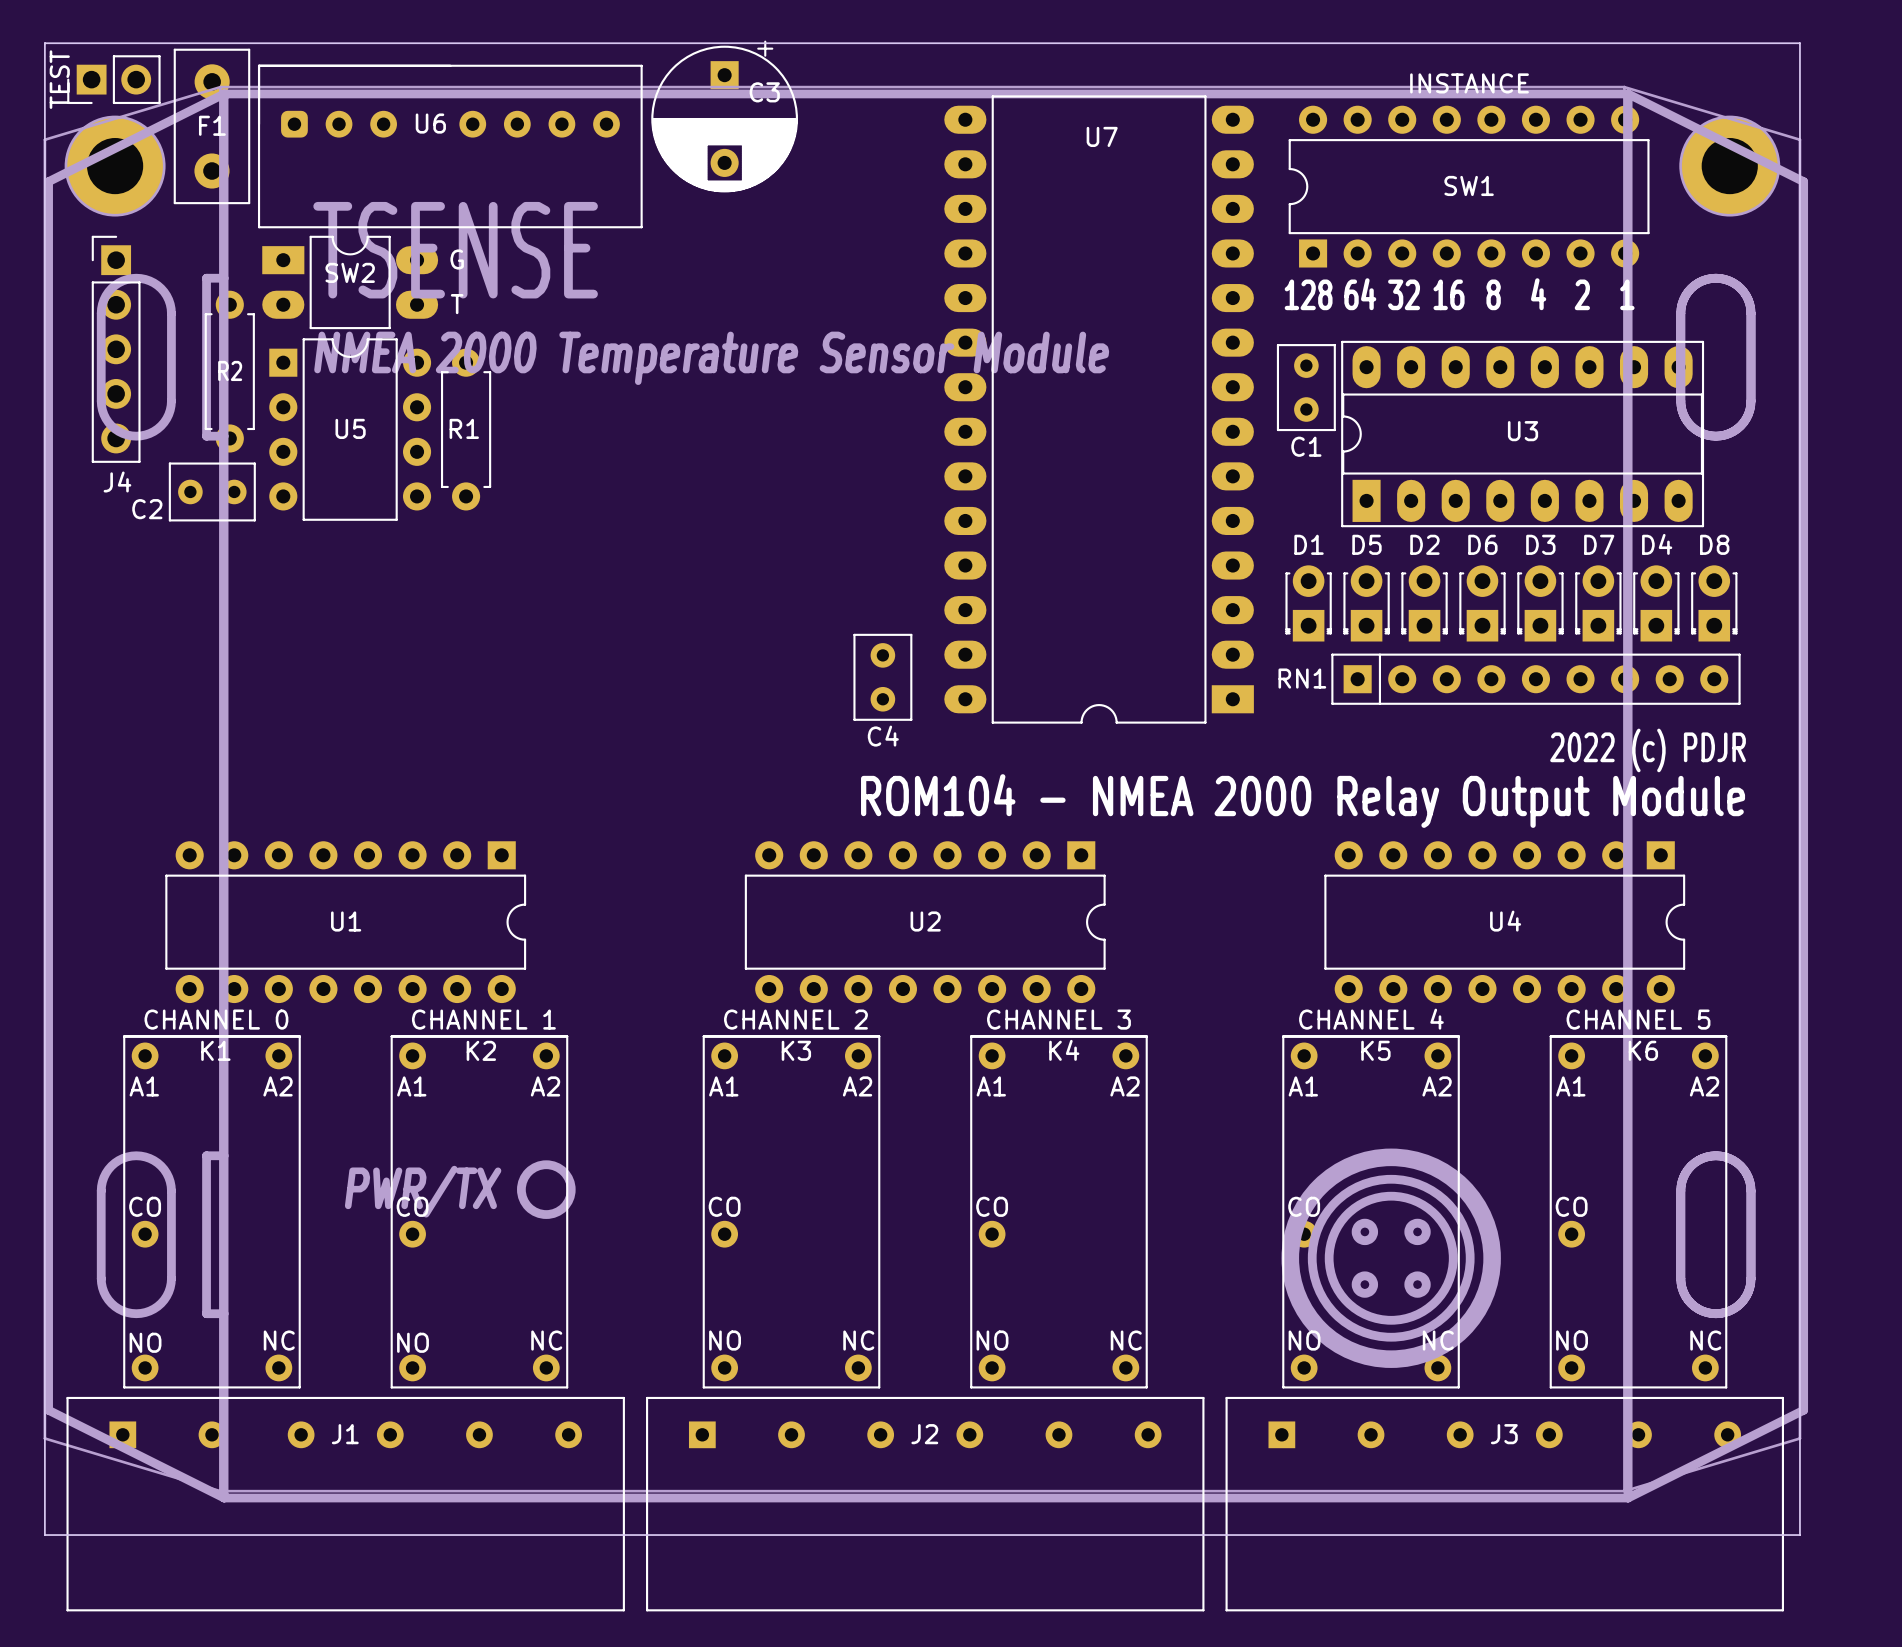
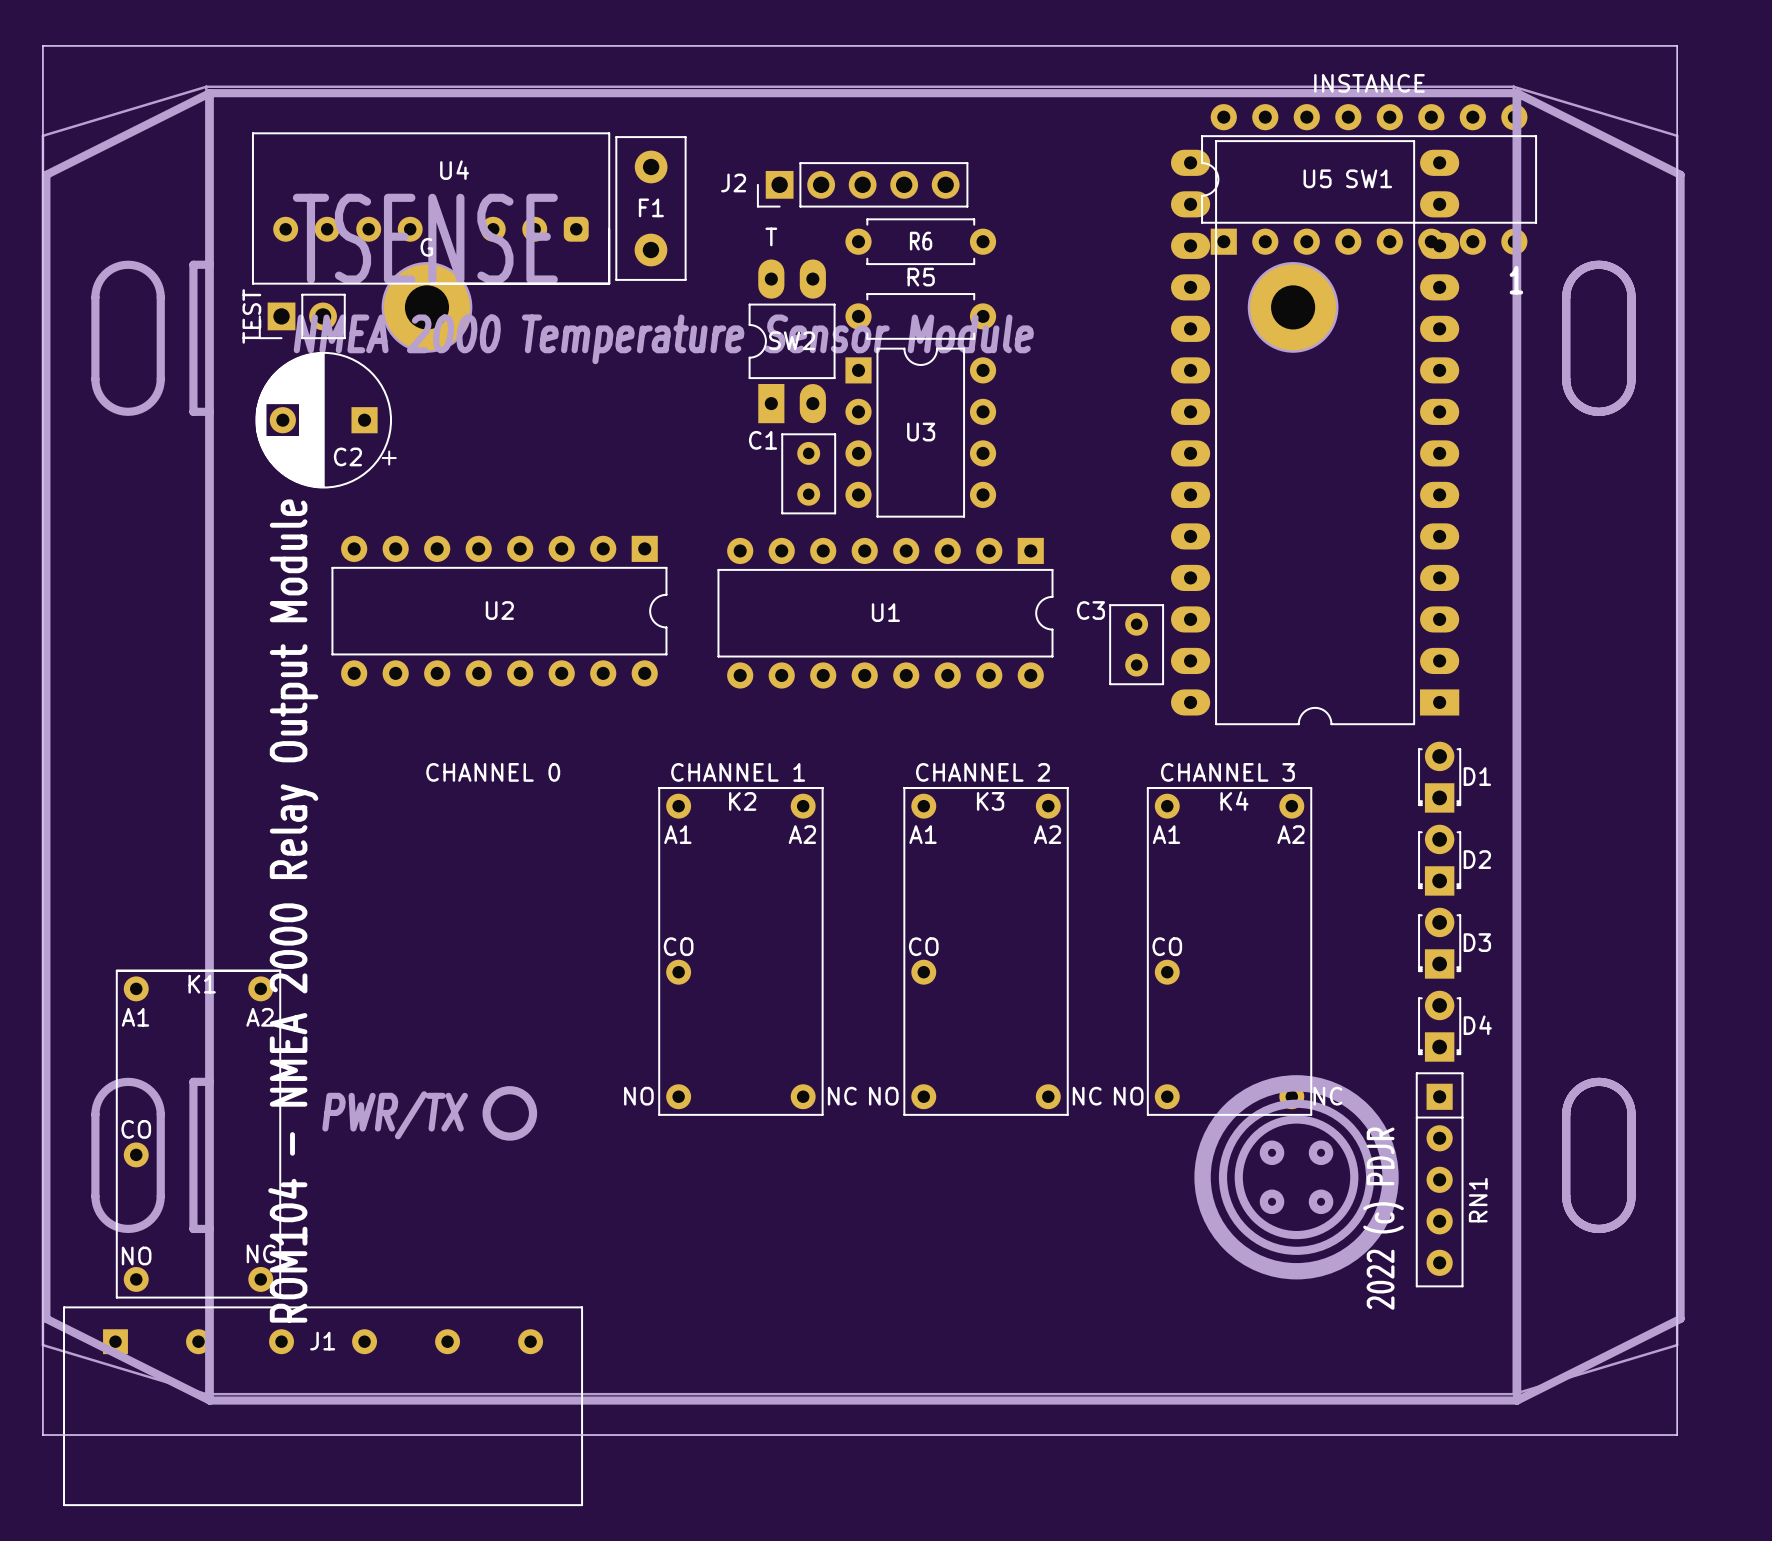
C3 footprint: [651, 40, 798, 193] -> [1109, 604, 1165, 686]
TEST position: (113, 79) -> (302, 316)
C3 name position: C3 (764, 92) -> C3 (1090, 610)
F1 position: (211, 126) -> (650, 208)
U6: (450, 146) -> none
part: (115, 166) -> none
part: (1729, 166) -> none
R6: none -> (920, 241)
SW2 rotation: 0° (350, 282) -> 90° counterclockwise (792, 341)
SW2 position: (350, 282) -> (792, 341)
text: 128 (1308, 294) -> none
text: 64 (1360, 294) -> none
text: 32 (1404, 294) -> none
text: 16 (1449, 294) -> none
text: 8 (1493, 294) -> none
text: 4 (1538, 294) -> none
text: 2 (1582, 294) -> none
text position: T (457, 304) -> T (771, 236)
part: none -> (426, 307)
part: none -> (1293, 307)
R5: none -> (920, 316)
U5 footprint: [269, 338, 432, 521] -> [1170, 140, 1460, 726]
U3 footprint: [1341, 340, 1705, 528] -> [845, 347, 997, 518]
J4: (116, 349) -> none
R2: (229, 371) -> none
C1 position: (1306, 387) -> (808, 473)
U7: (1099, 409) -> none
U5 name position: U5 (350, 428) -> U5 (1317, 178)
R1: (466, 429) -> none
C1 name position: C1 (1306, 446) -> C1 (763, 440)
C2 footprint: [168, 462, 256, 522] -> [255, 351, 397, 489]
C2 name position: C2 (147, 509) -> C2 (347, 456)
D1 name position: D1 (1309, 544) -> D1 (1477, 776)
D2 name position: D2 (1424, 544) -> D2 (1477, 859)
D3 name position: D3 (1540, 544) -> D3 (1477, 942)
D4 name position: D4 (1657, 544) -> D4 (1477, 1025)
D1 position: (1308, 603) -> (1439, 777)
D5: (1366, 603) -> none
D2 position: (1424, 603) -> (1439, 860)
D6: (1482, 603) -> none
D3 position: (1540, 603) -> (1439, 943)
D7: (1598, 603) -> none
D4 position: (1656, 603) -> (1439, 1026)
D8: (1714, 603) -> none
RN1 footprint: [1331, 653, 1741, 705] -> [1415, 1072, 1464, 1288]
C4: (882, 677) -> none
RN1 name position: RN1 (1302, 678) -> RN1 (1478, 1200)
text: 2022 (c) PDJR (1648, 750) -> none
text: ROM104 - NMEA 2000 Relay Output Module (1303, 801) -> none
U4 footprint: [1324, 841, 1686, 1004] -> [251, 132, 611, 285]
U4 name position: U4 (1505, 921) -> U4 (454, 170)
U1 position: (345, 922) -> (885, 613)
U2 position: (925, 922) -> (499, 611)
text: none -> ROM104 - NMEA 2000 Relay Output Module (293, 911)
text position: CHANNEL 0 (216, 1019) -> CHANNEL 0 (493, 772)
text position: CHANNEL 1 (483, 1019) -> CHANNEL 1 (738, 772)
text position: CHANNEL 2 (795, 1019) -> CHANNEL 2 (983, 772)
text position: CHANNEL 3 (1058, 1019) -> CHANNEL 3 (1227, 772)
text: CHANNEL 4 (1371, 1019) -> none
text: CHANNEL 5 (1638, 1019) -> none
K2 position: (479, 1211) -> (740, 951)
K3 position: (791, 1211) -> (986, 951)
K4 position: (1058, 1211) -> (1229, 951)
K5: (1371, 1211) -> none
K6: (1638, 1211) -> none
text: none -> 2022 (c) PDJR (1383, 1218)
K2 text position: NC (546, 1340) -> NC (842, 1096)
K3 text position: NO (725, 1340) -> NO (883, 1096)
K3 text position: NC (858, 1340) -> NC (1087, 1096)
K4 text position: NO (992, 1340) -> NO (1128, 1096)
K4 text position: NC (1126, 1340) -> NC (1327, 1096)
K2 text position: NO (413, 1342) -> NO (638, 1096)
J2 footprint: [646, 1396, 1205, 1612] -> [756, 162, 969, 208]
J2 name position: J2 (924, 1434) -> J2 (733, 182)
J3: (1504, 1504) -> none

